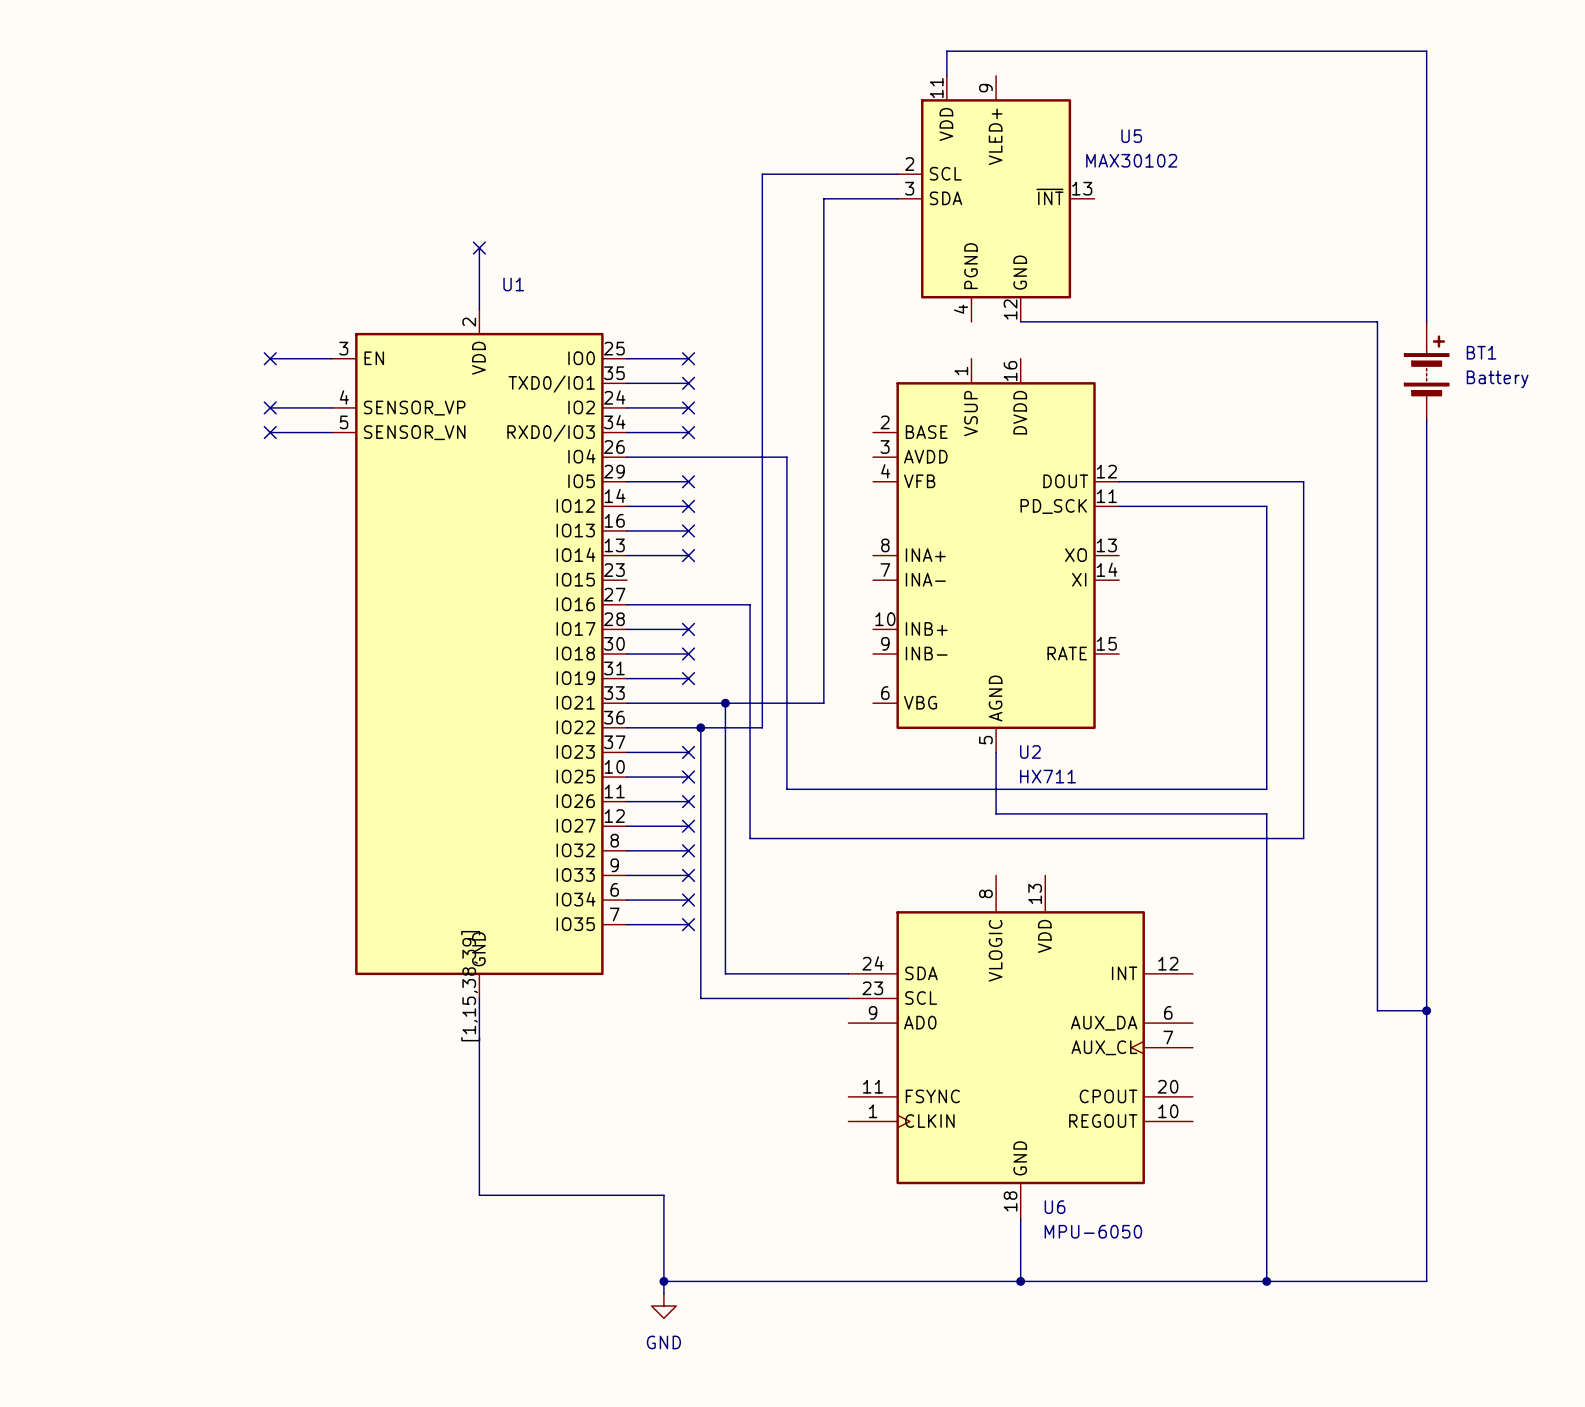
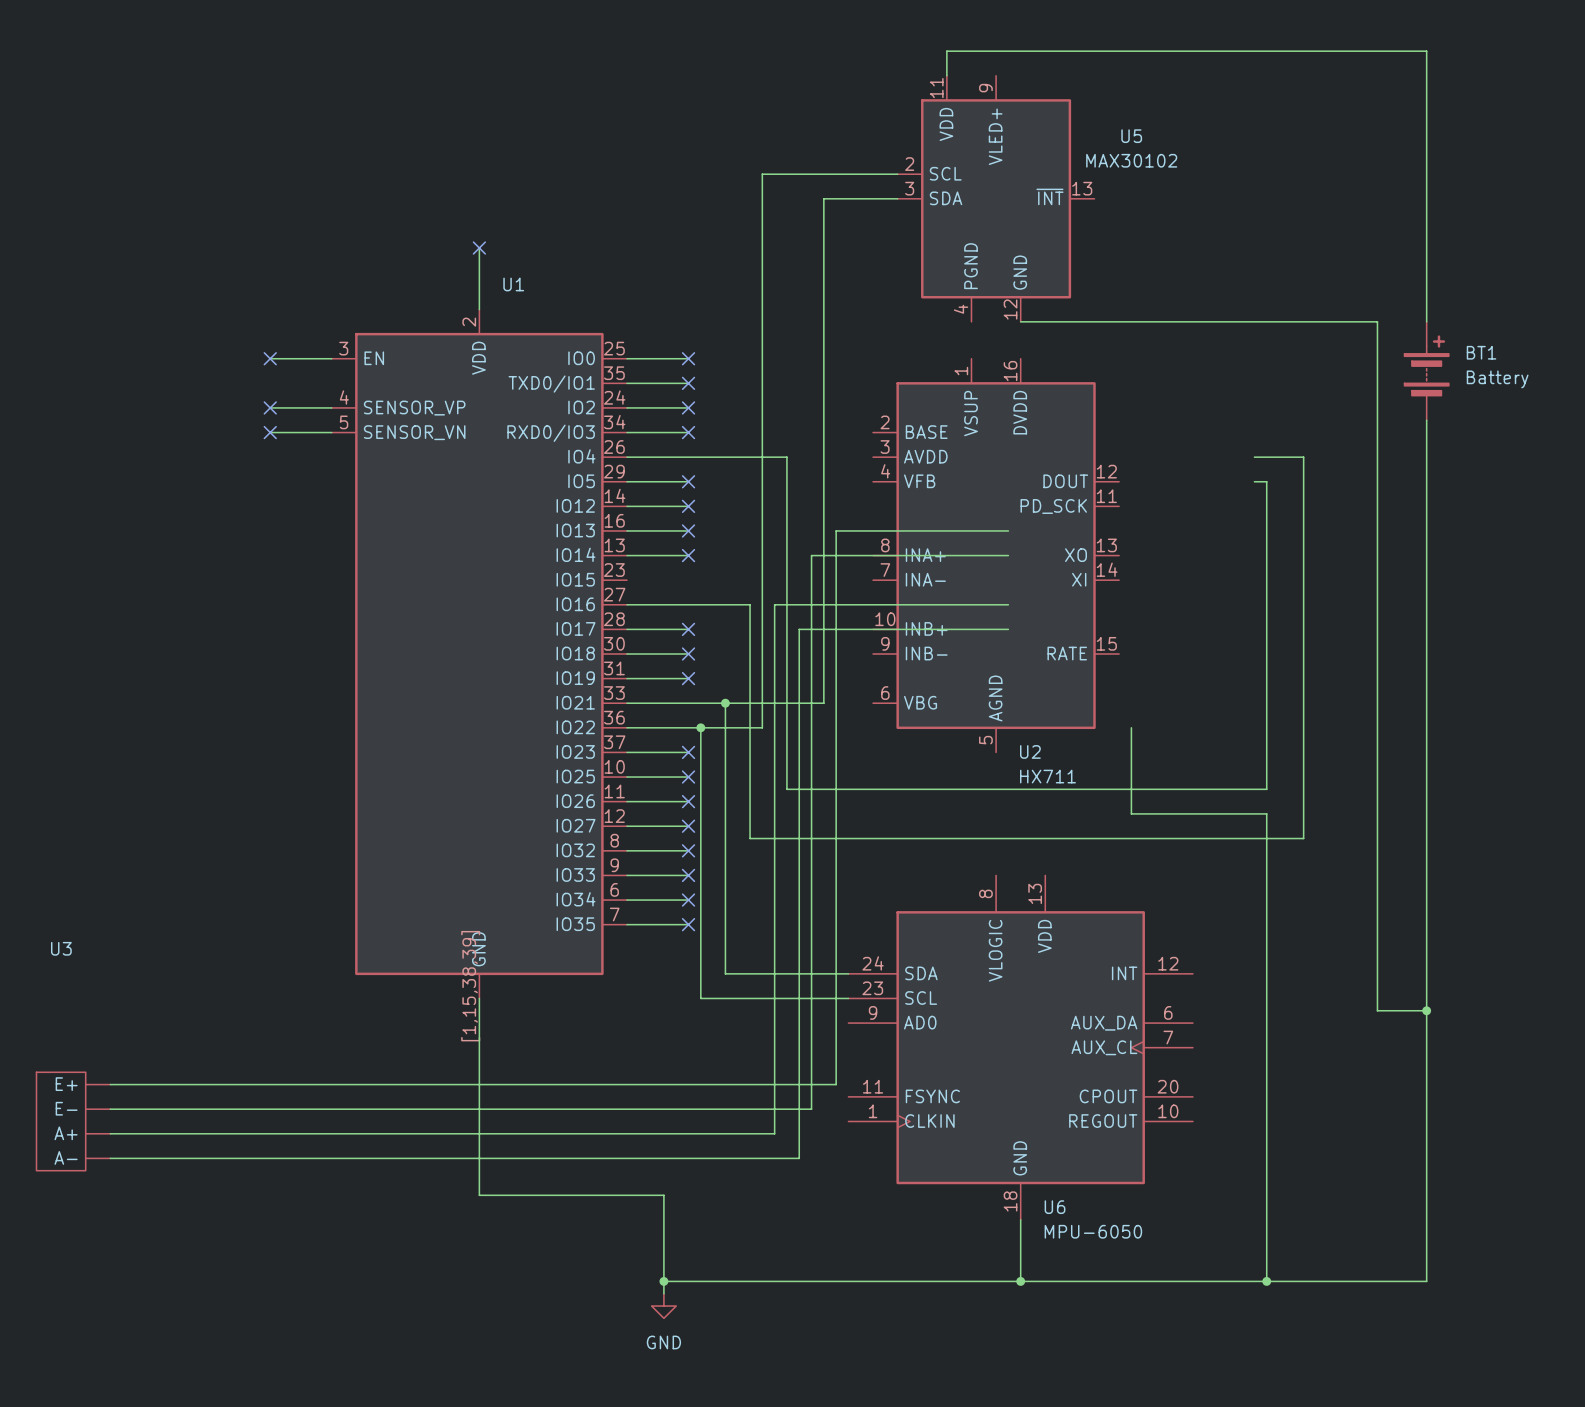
wire: (1119, 481) (1254, 481) -> none
wire: (1266, 481) (1303, 481) -> (1254, 457) (1303, 457) (1303, 481)
wire: (1119, 506) (1266, 506) -> (1266, 481) (1266, 506)
wire: none -> (1008, 530) (836, 530) (836, 1084) (110, 1084)
wire: none -> (1008, 555) (811, 555) (811, 1109) (110, 1109)
wire: none -> (1008, 604) (774, 604) (774, 1133) (110, 1133)
wire: none -> (1008, 629) (799, 629) (799, 1158) (110, 1158)
wire: (996, 752) (996, 813) (1131, 813) -> (1131, 727) (1131, 813)
U3: none -> (73, 1072)

